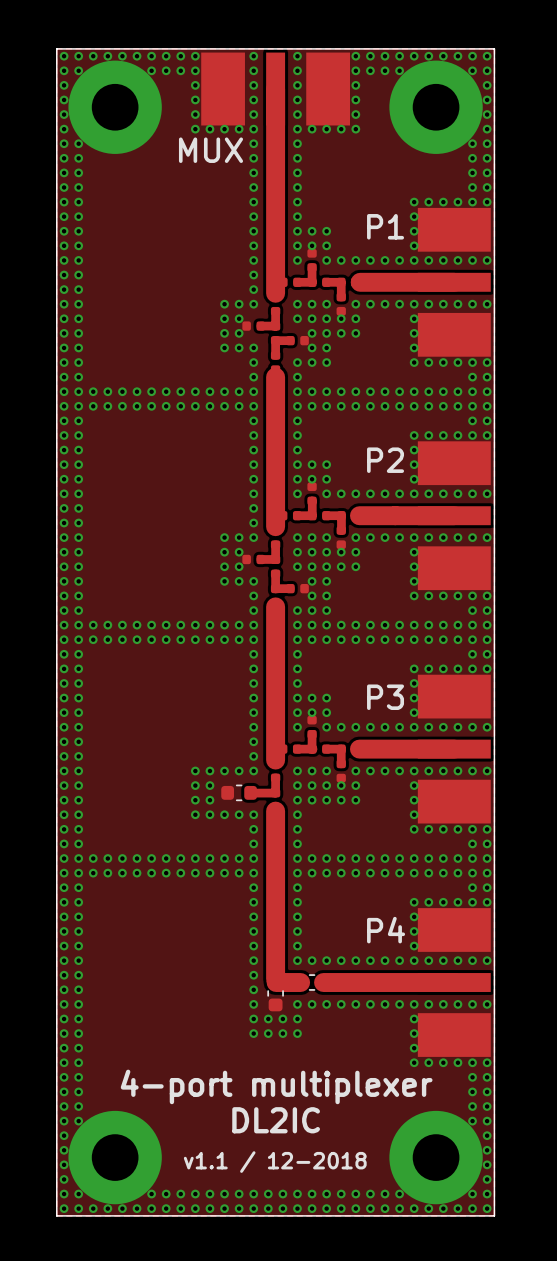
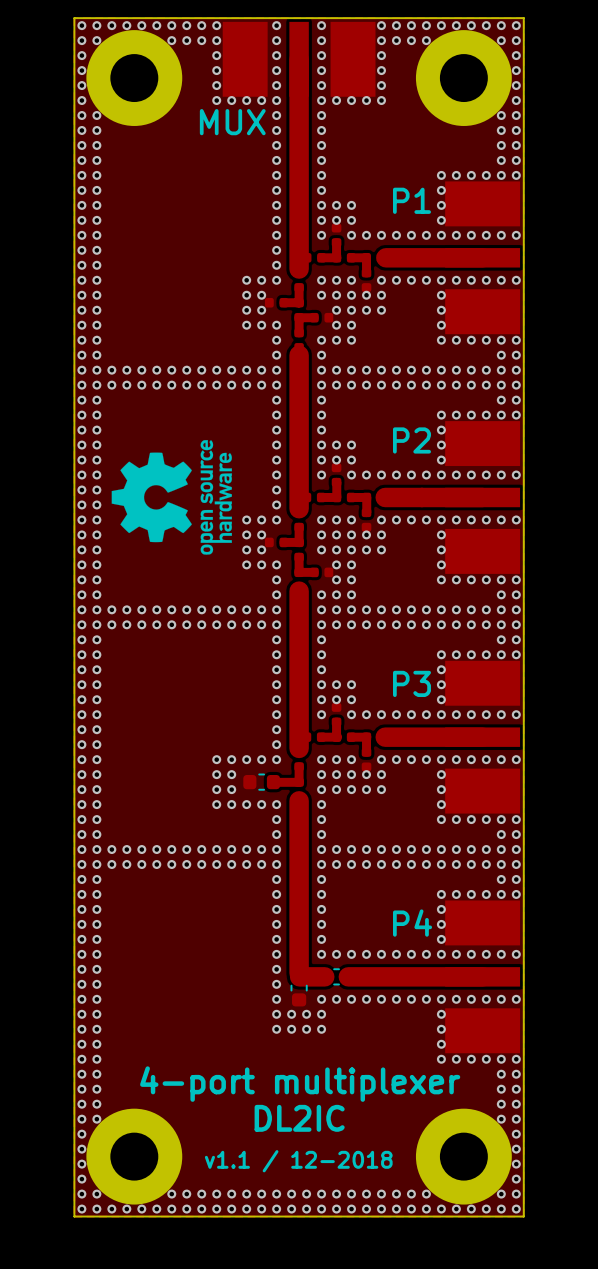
drawing: none -> [111, 440, 232, 555]

